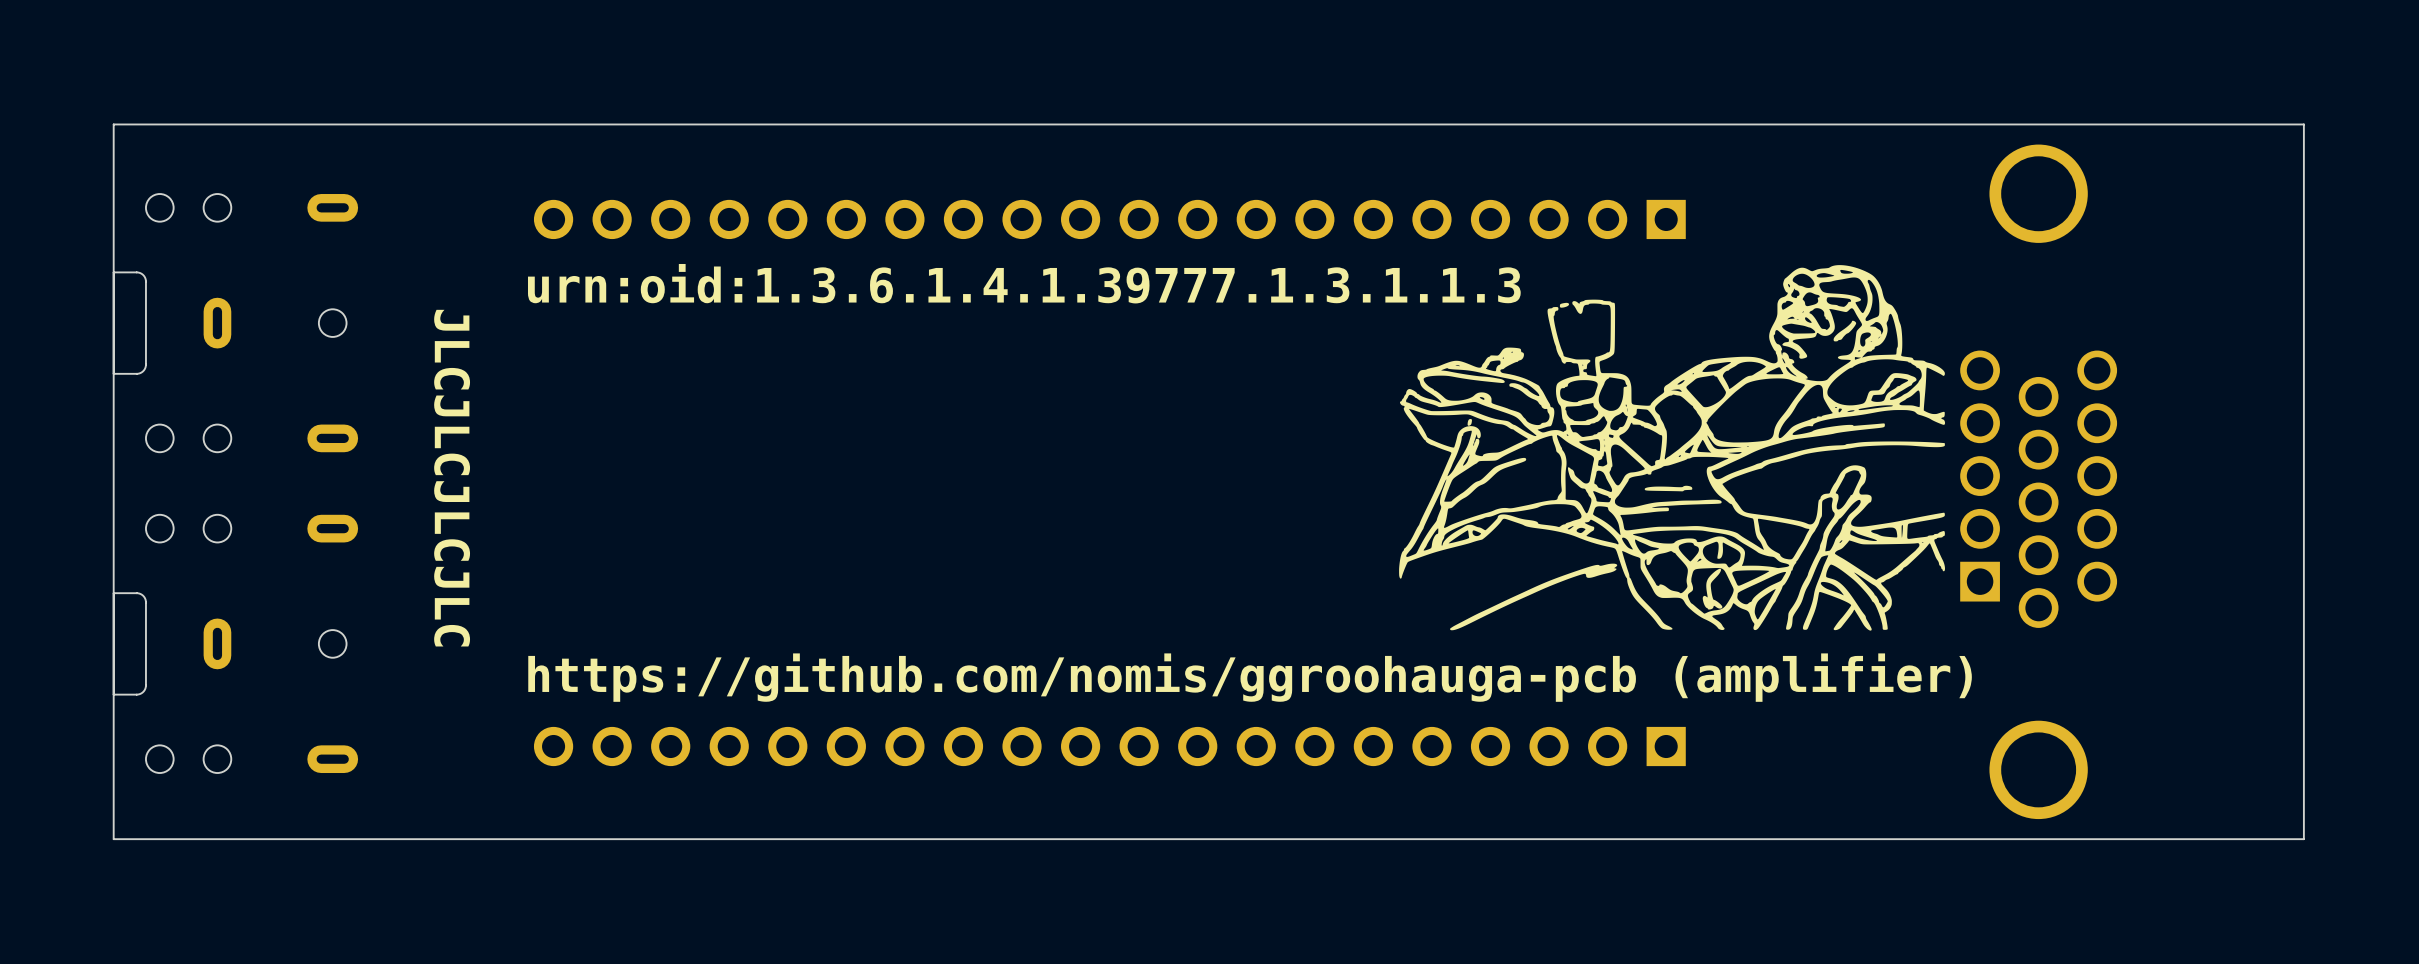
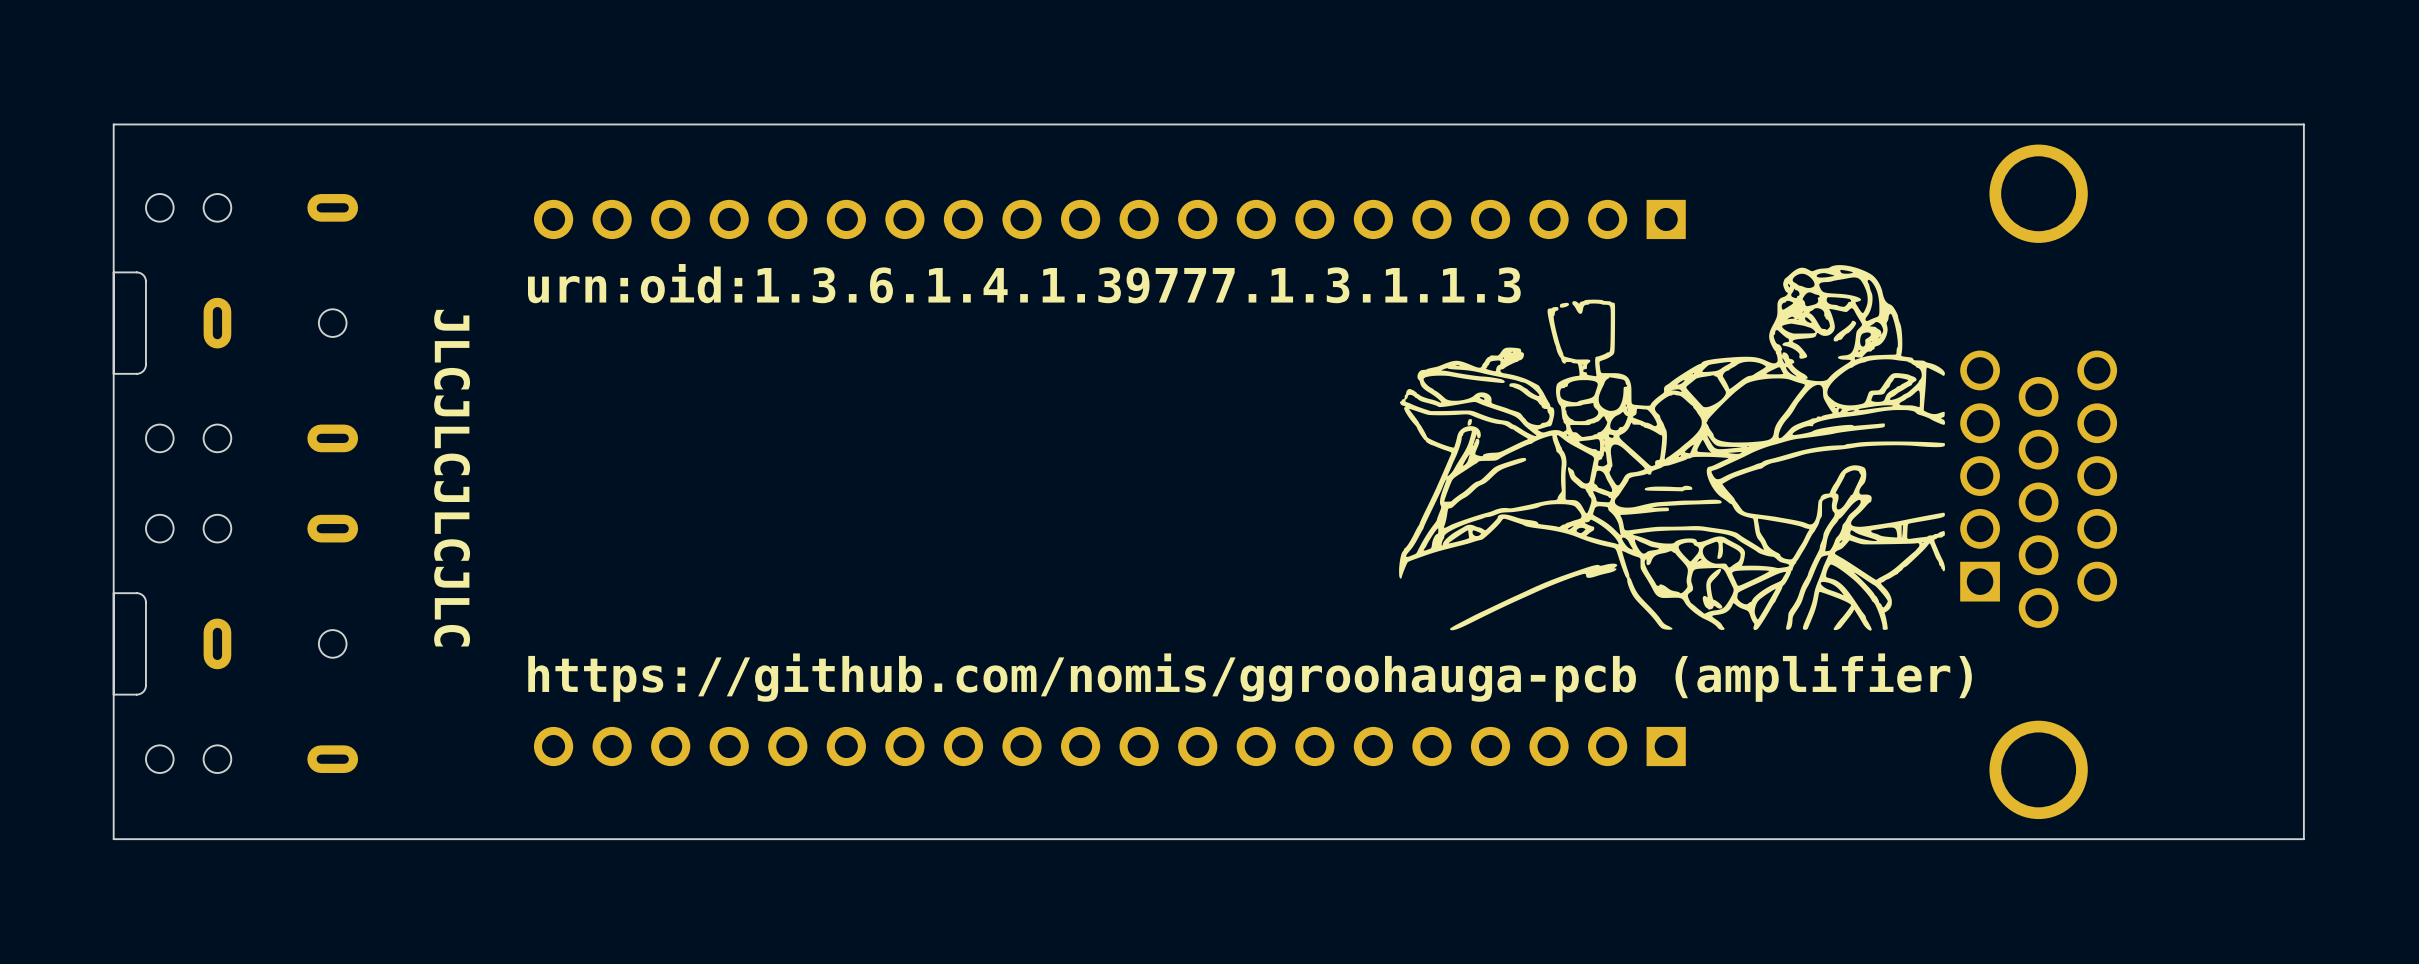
drawing shape: [1399, 265, 1946, 631] -> [1399, 265, 1946, 631]

